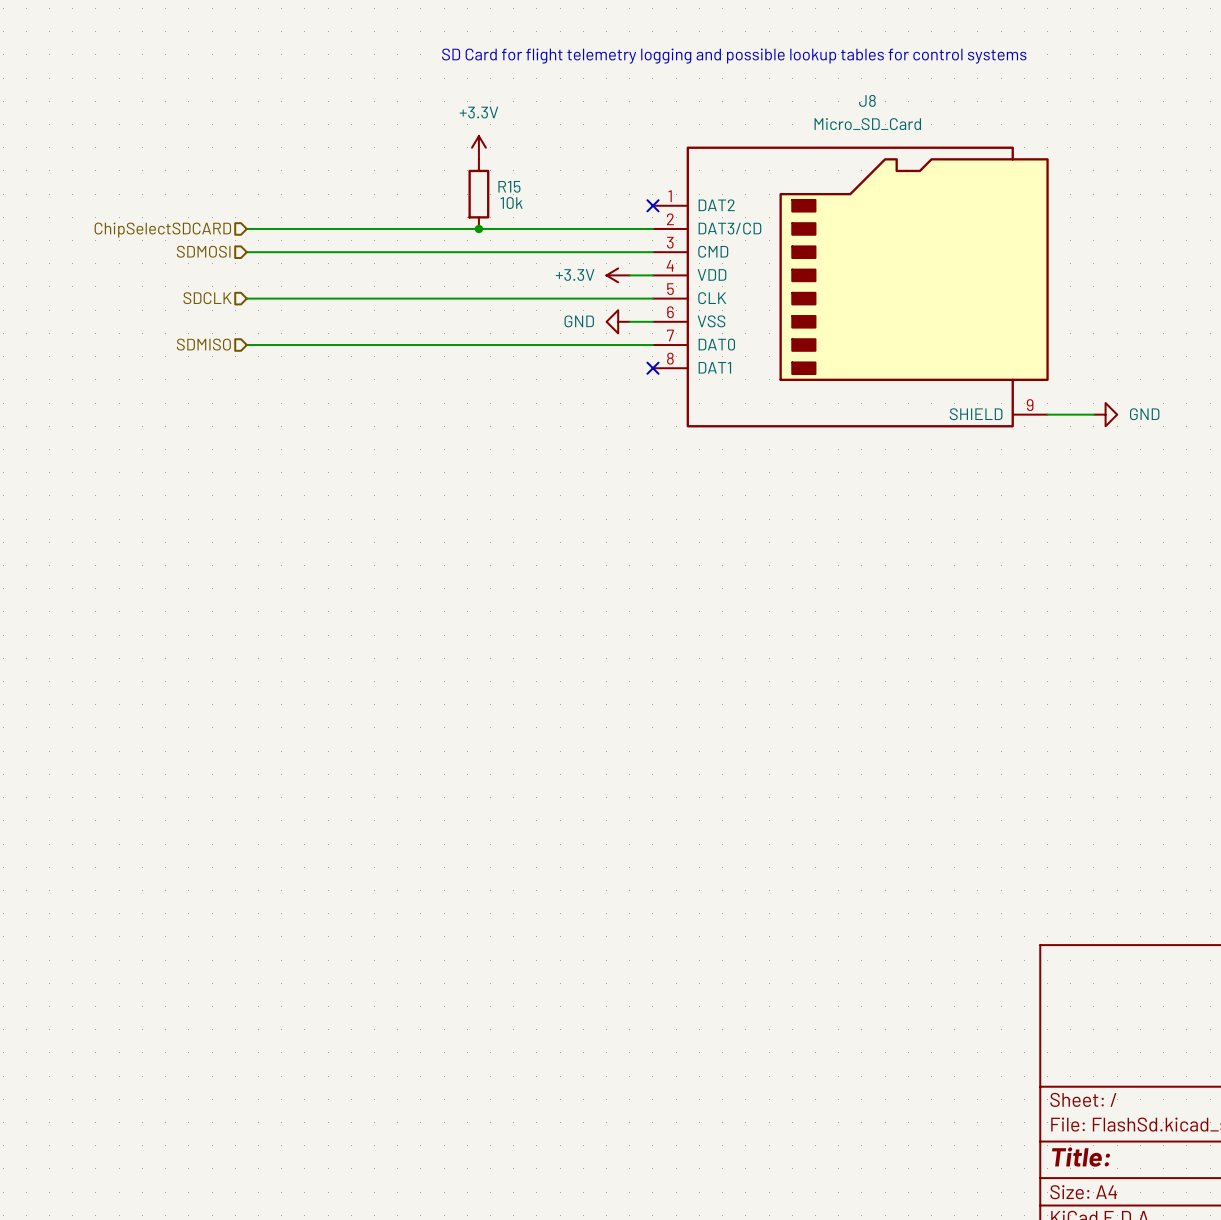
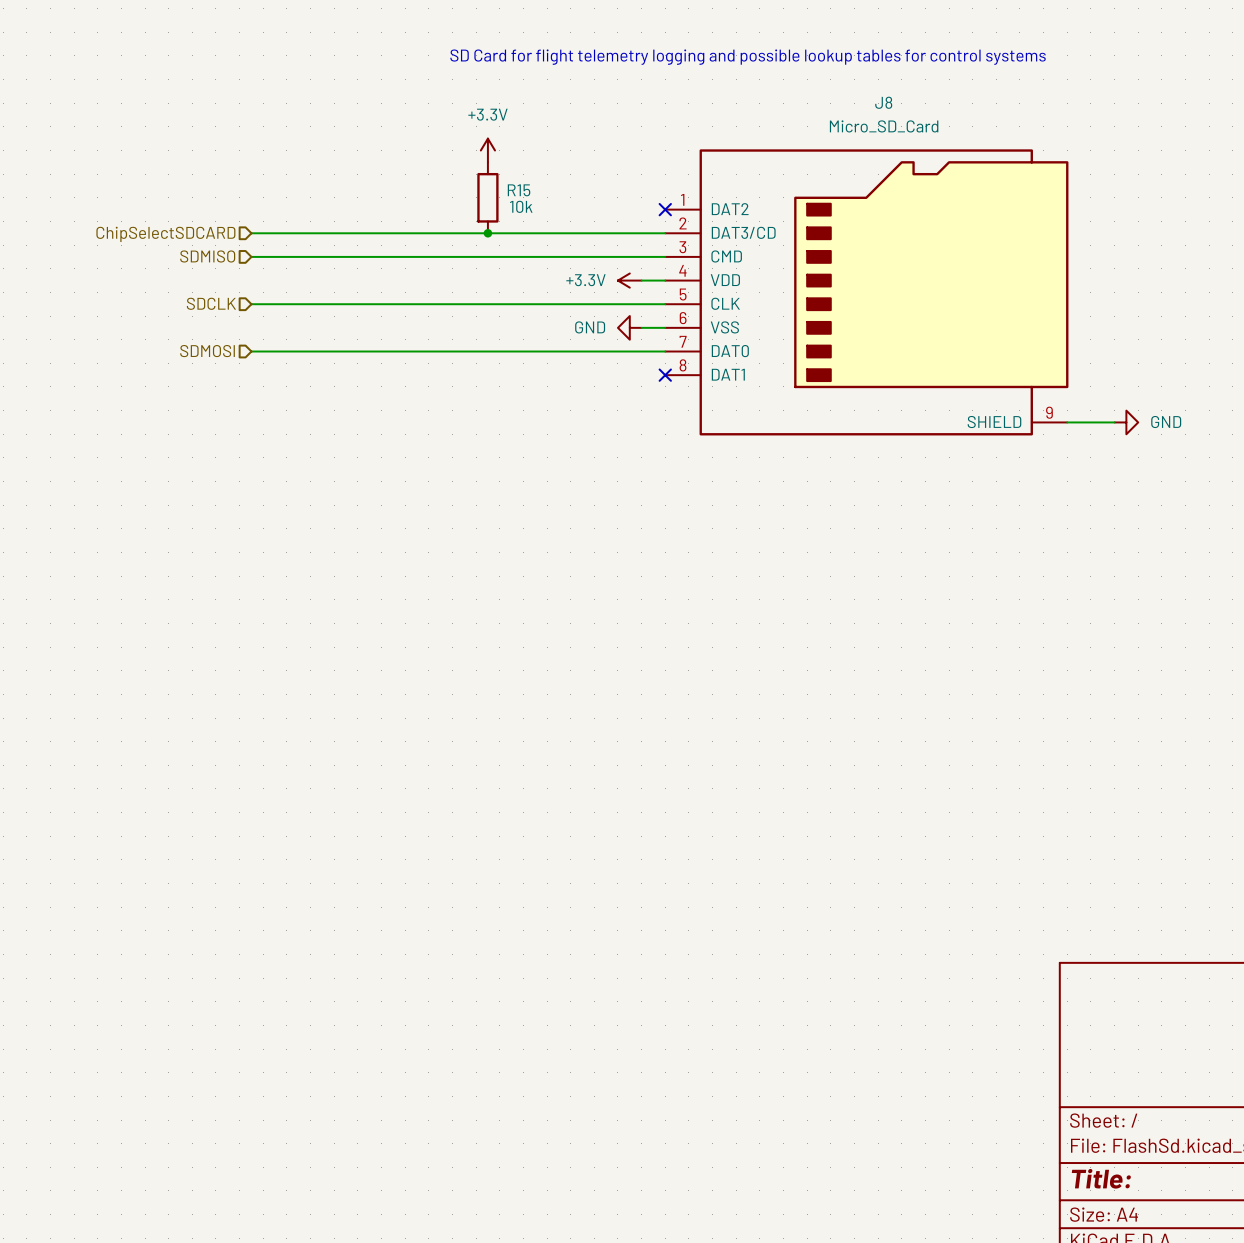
hierarchical label: SDMOSI (203, 251) -> SDMISO (207, 256)
hierarchical label: SDMISO (203, 344) -> SDMOSI (207, 351)

